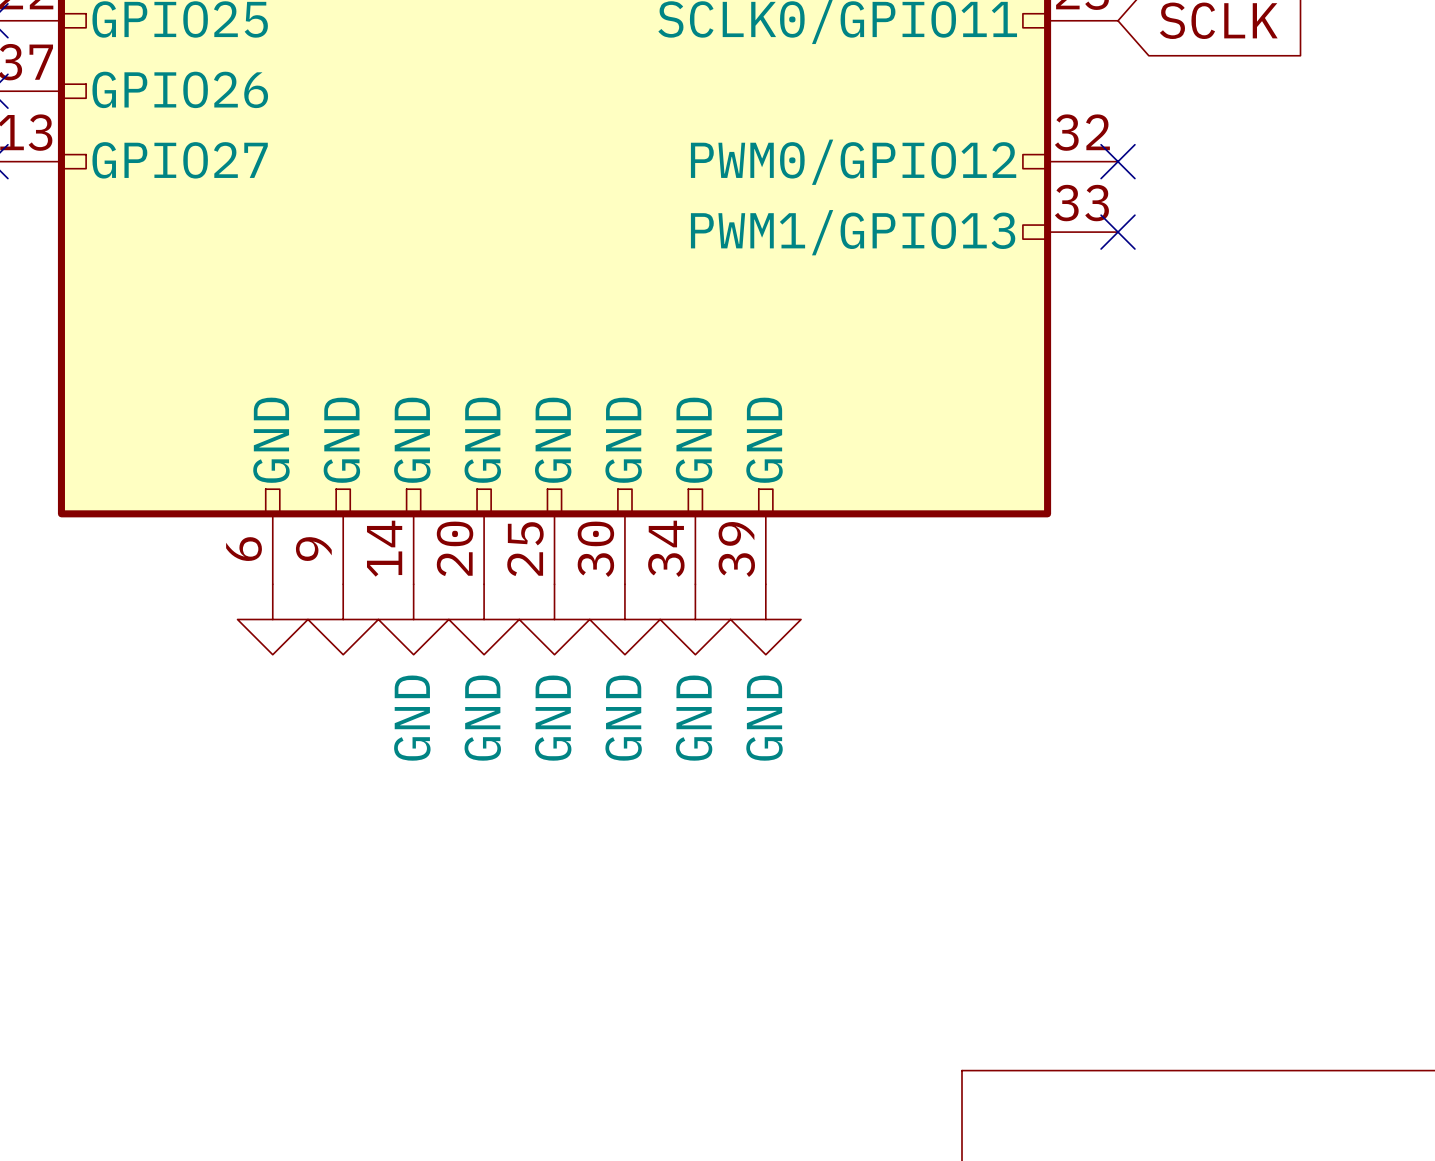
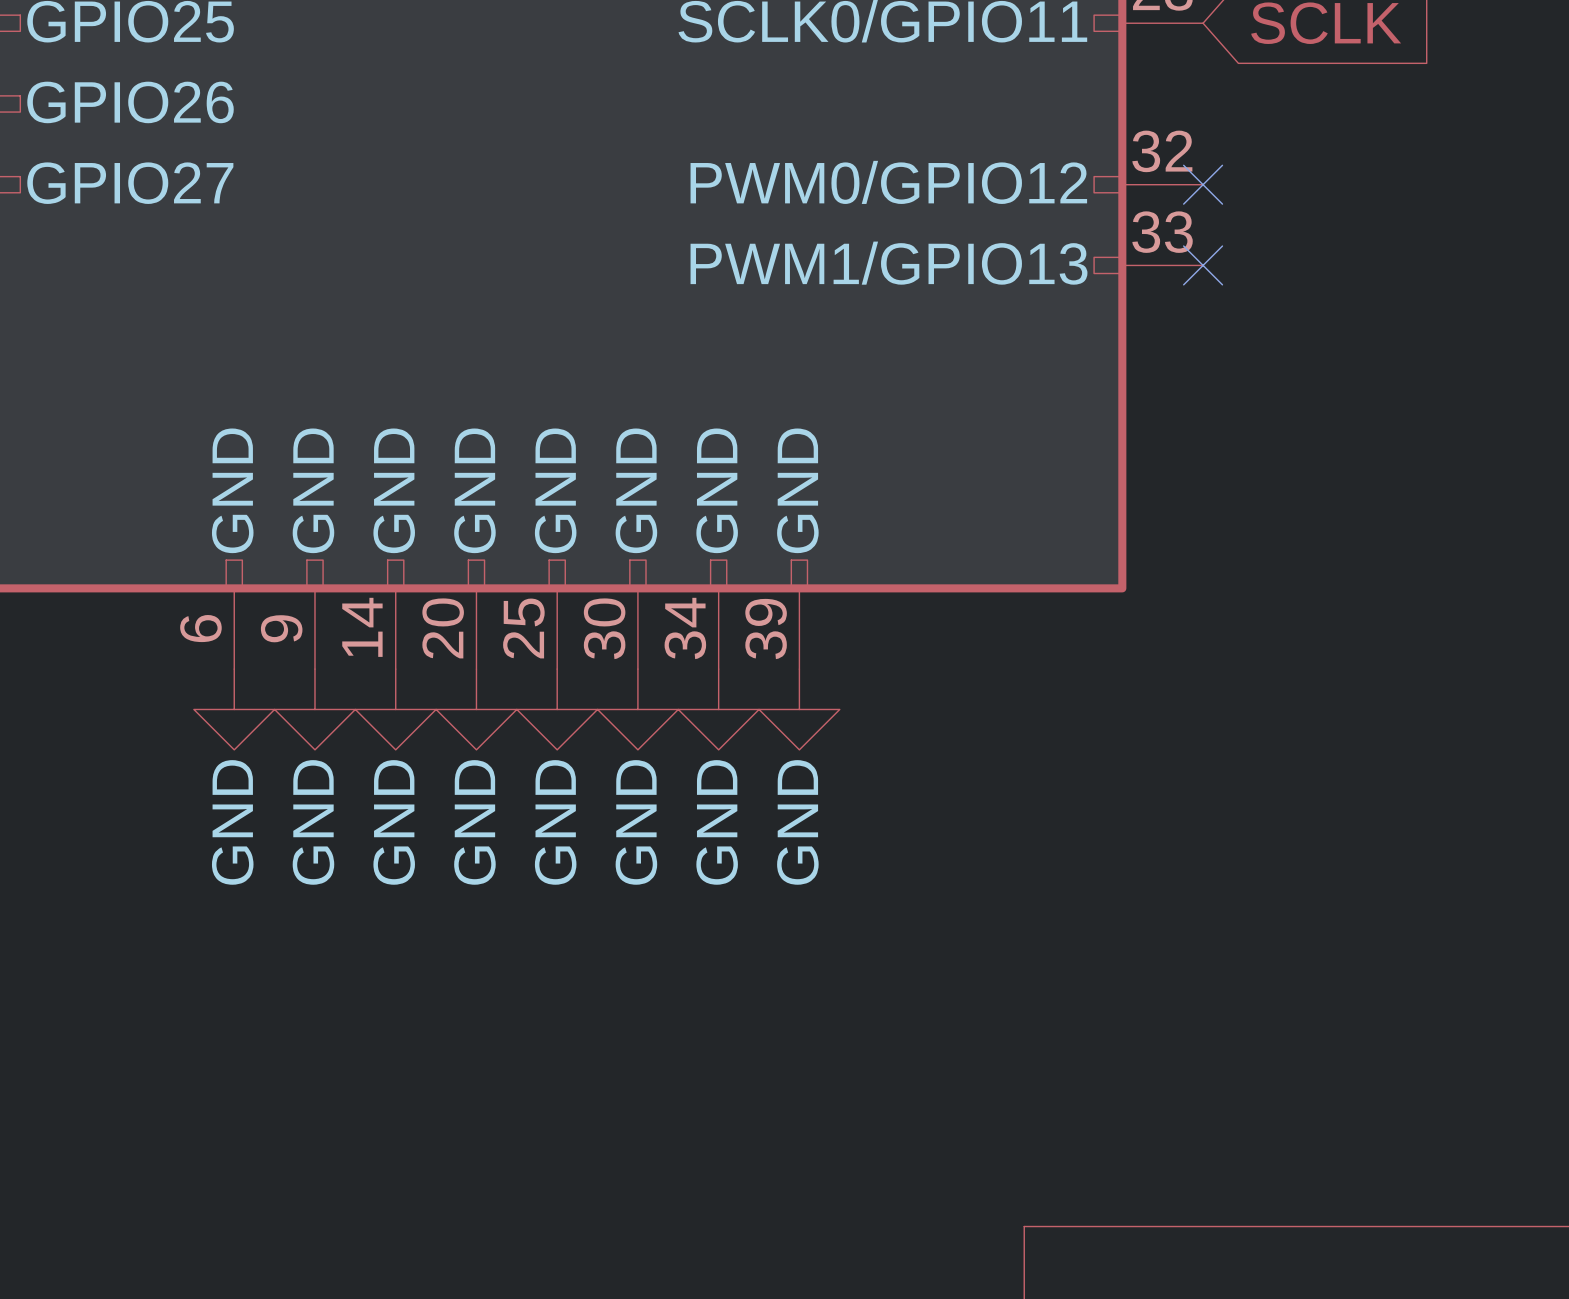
power symbol text: none -> GND (232, 822)
power symbol text: none -> GND (313, 822)

